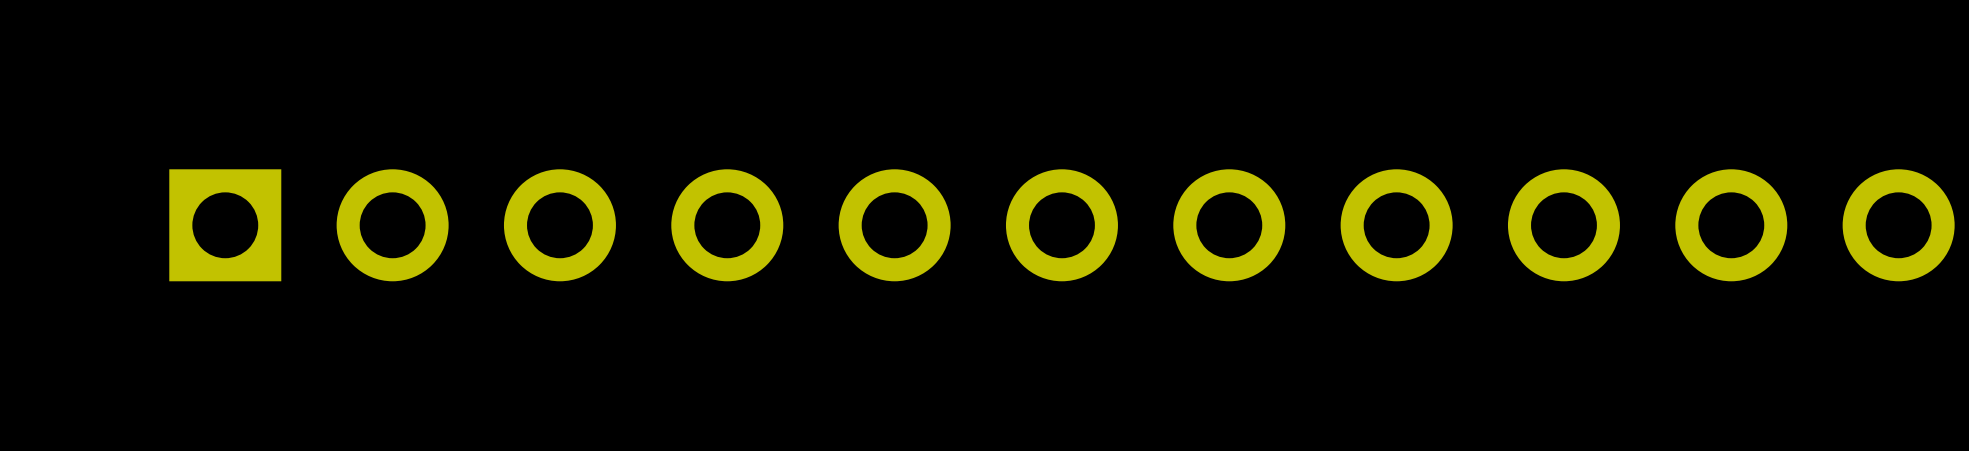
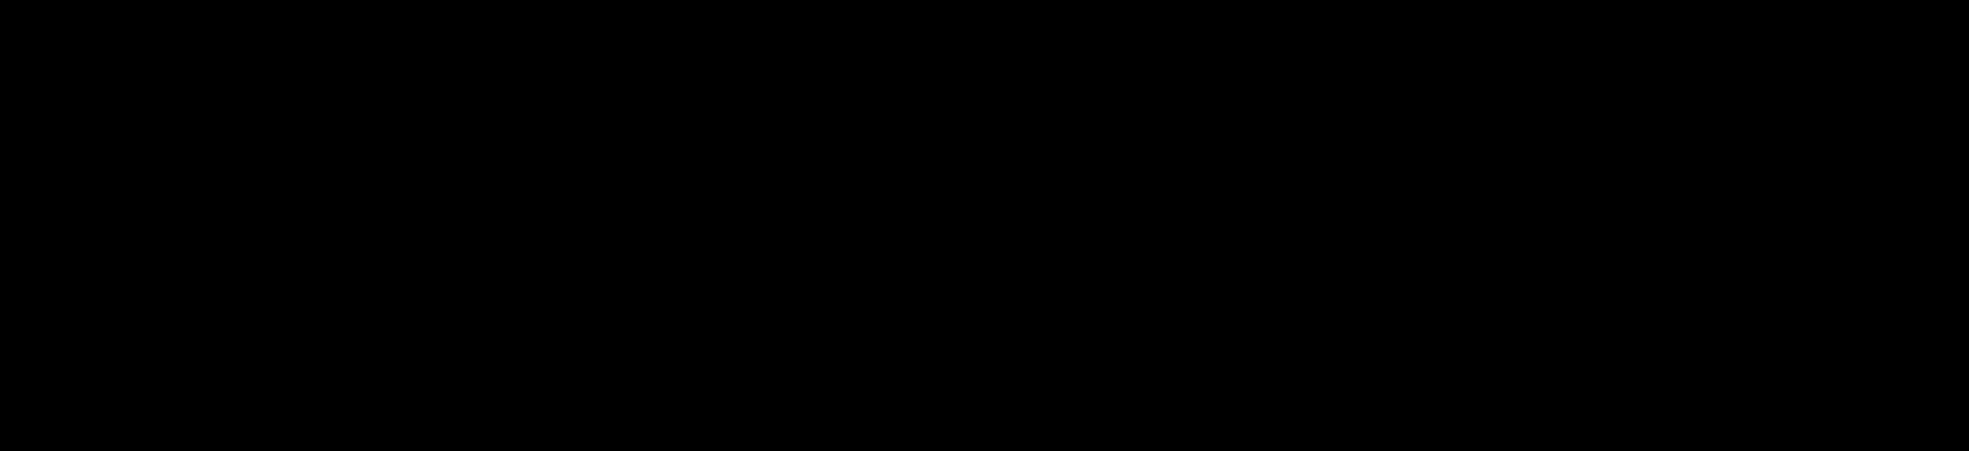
part: (1061, 225) -> none

